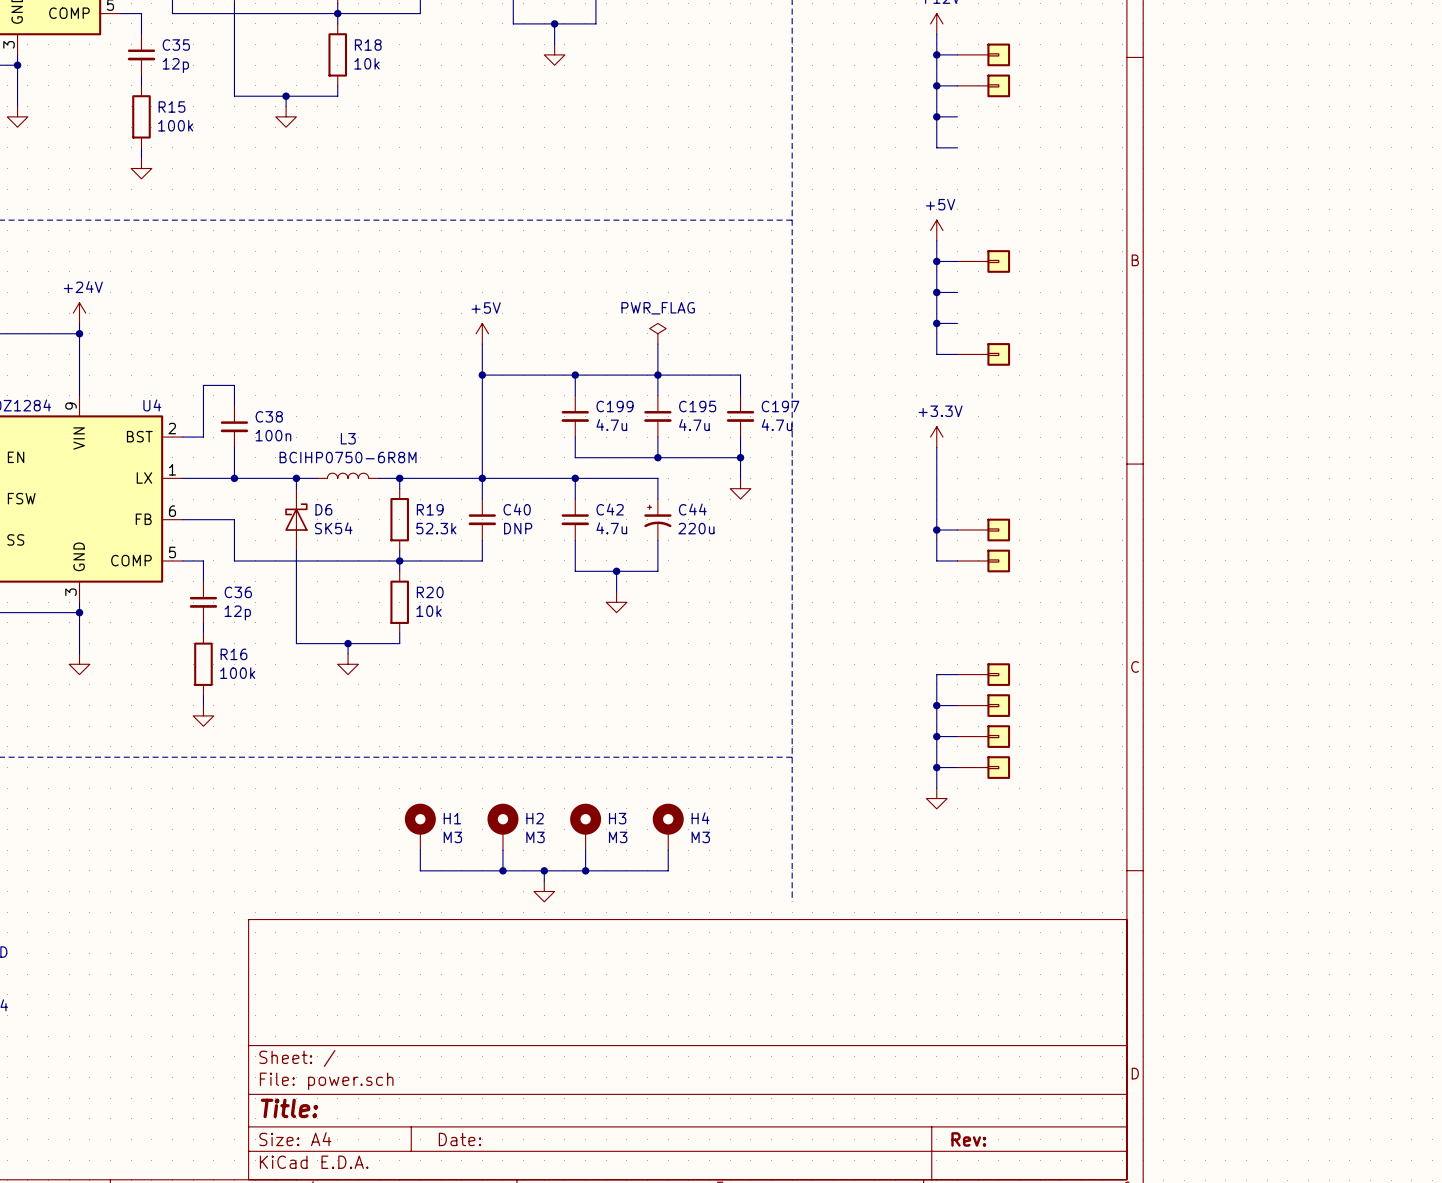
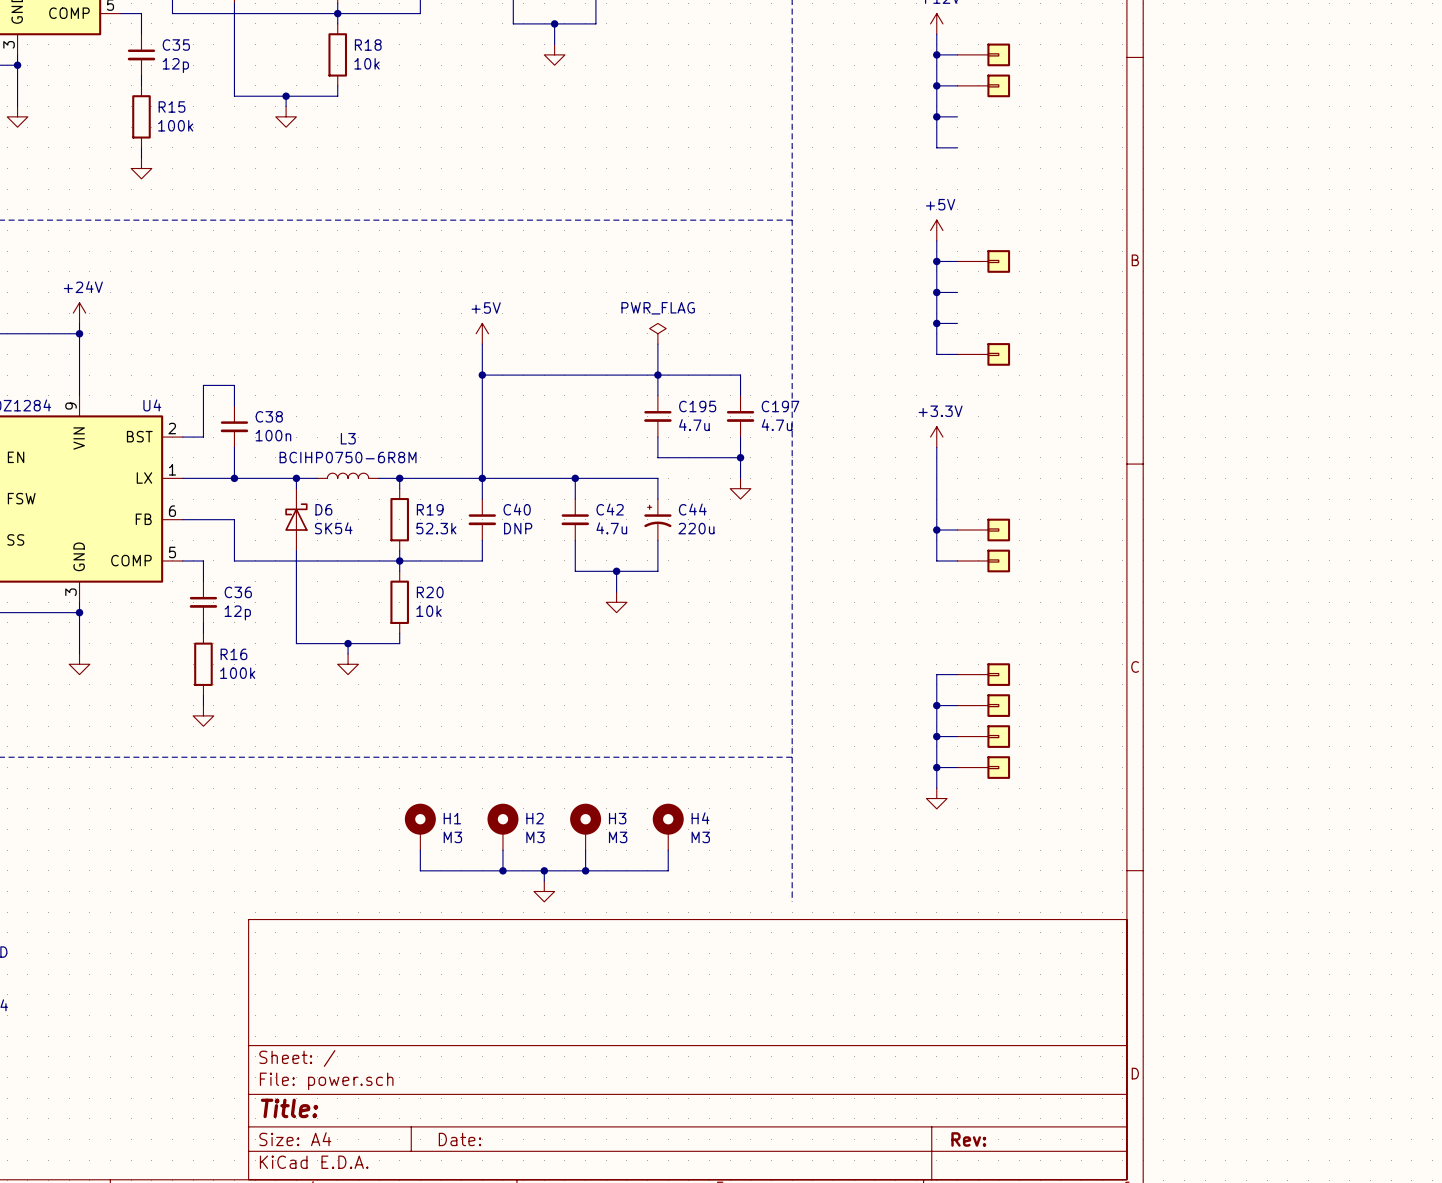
wire: (575, 375) (575, 395) -> none
junction: (575, 375) -> none
C199: 4.7u (575, 416) -> none
wire: (575, 437) (575, 457) (657, 457) -> none
junction: (657, 457) -> none

